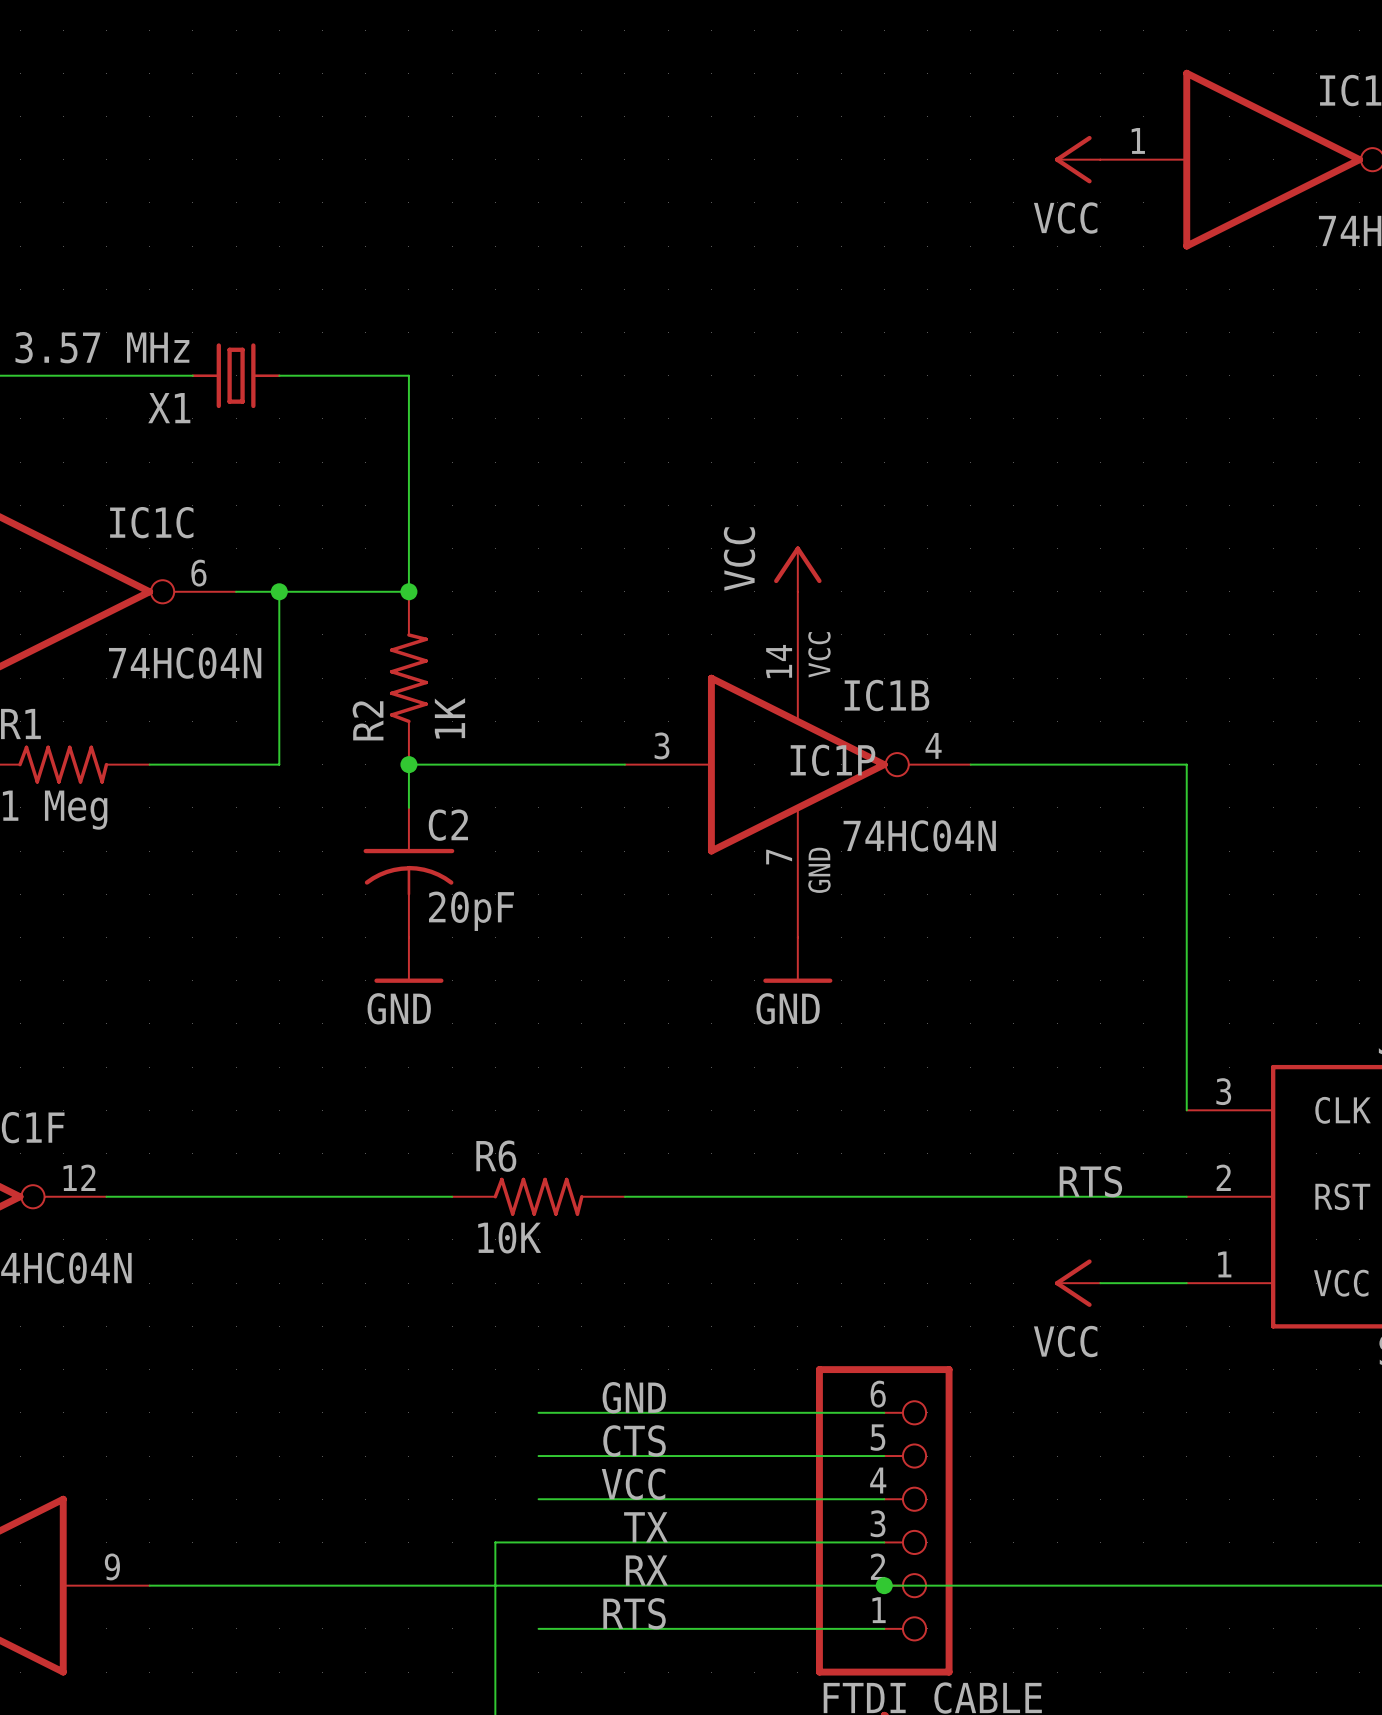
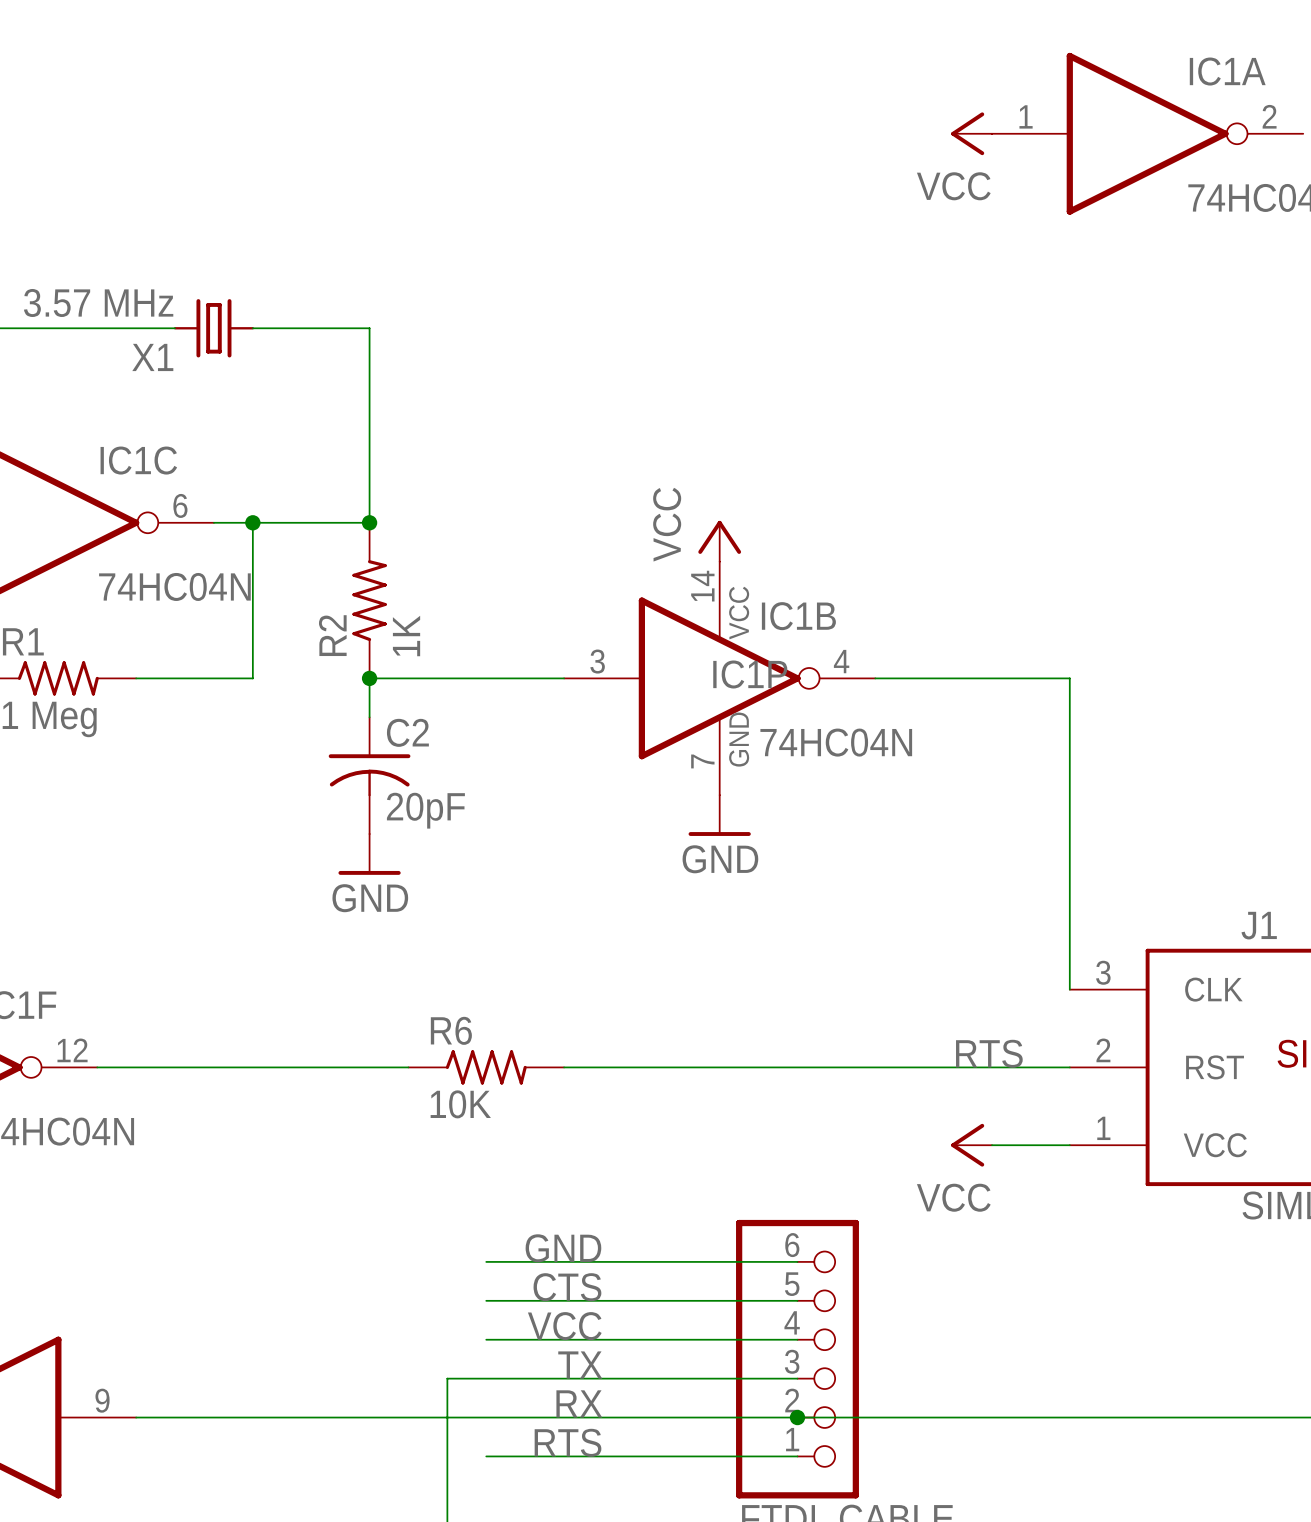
power symbol position: VCC (797, 569) -> VCC (719, 541)
IC1P symbol: [797, 591, 798, 938] -> [719, 561, 720, 796]
power symbol position: GND (797, 960) -> GND (719, 815)

